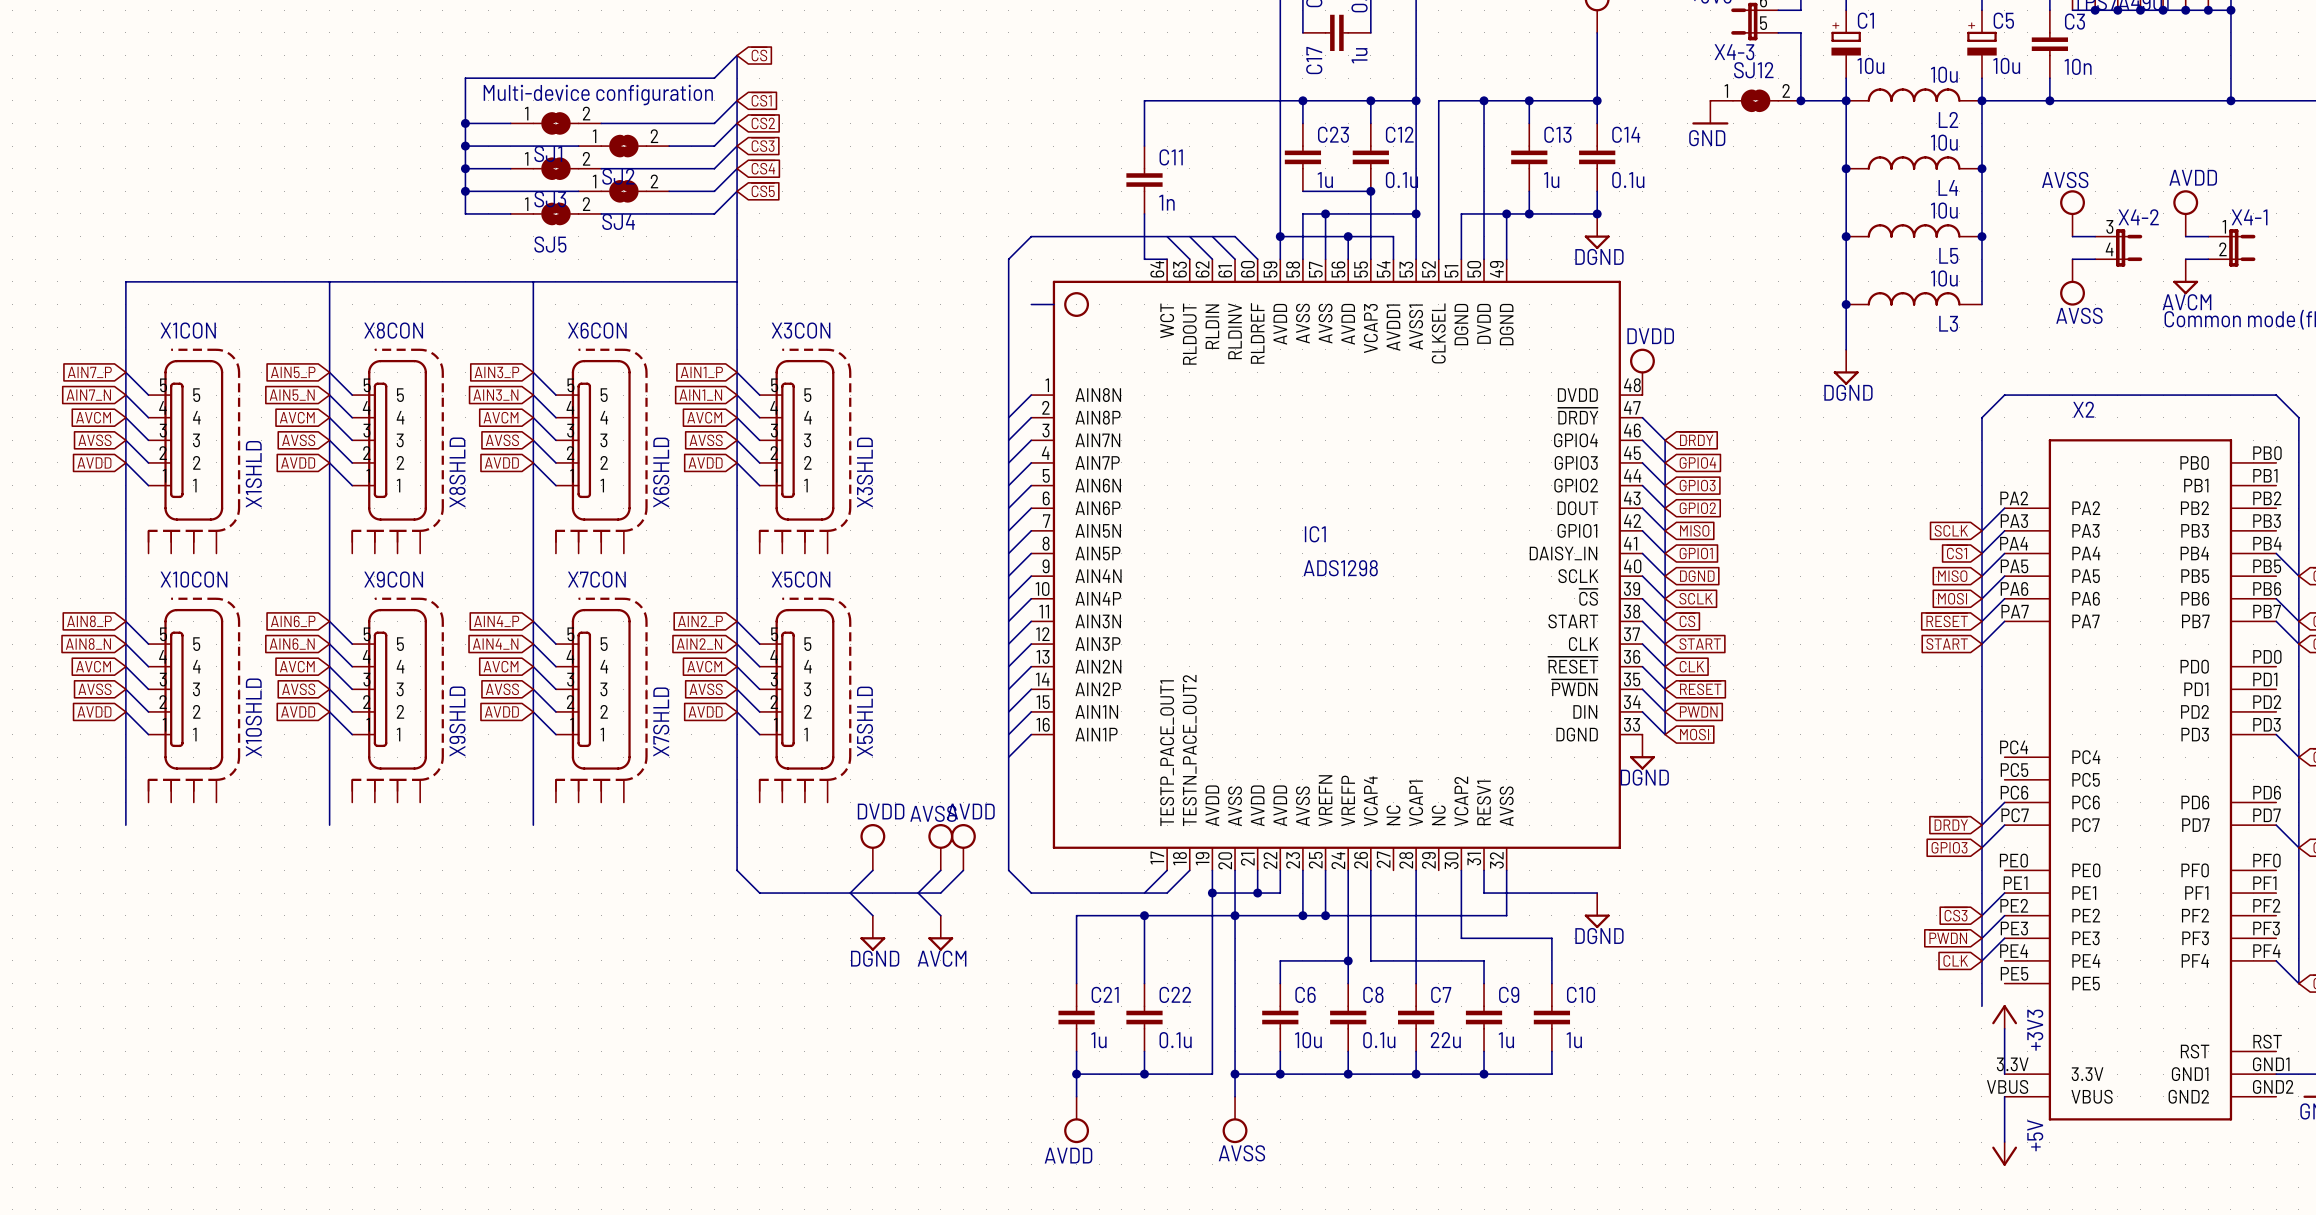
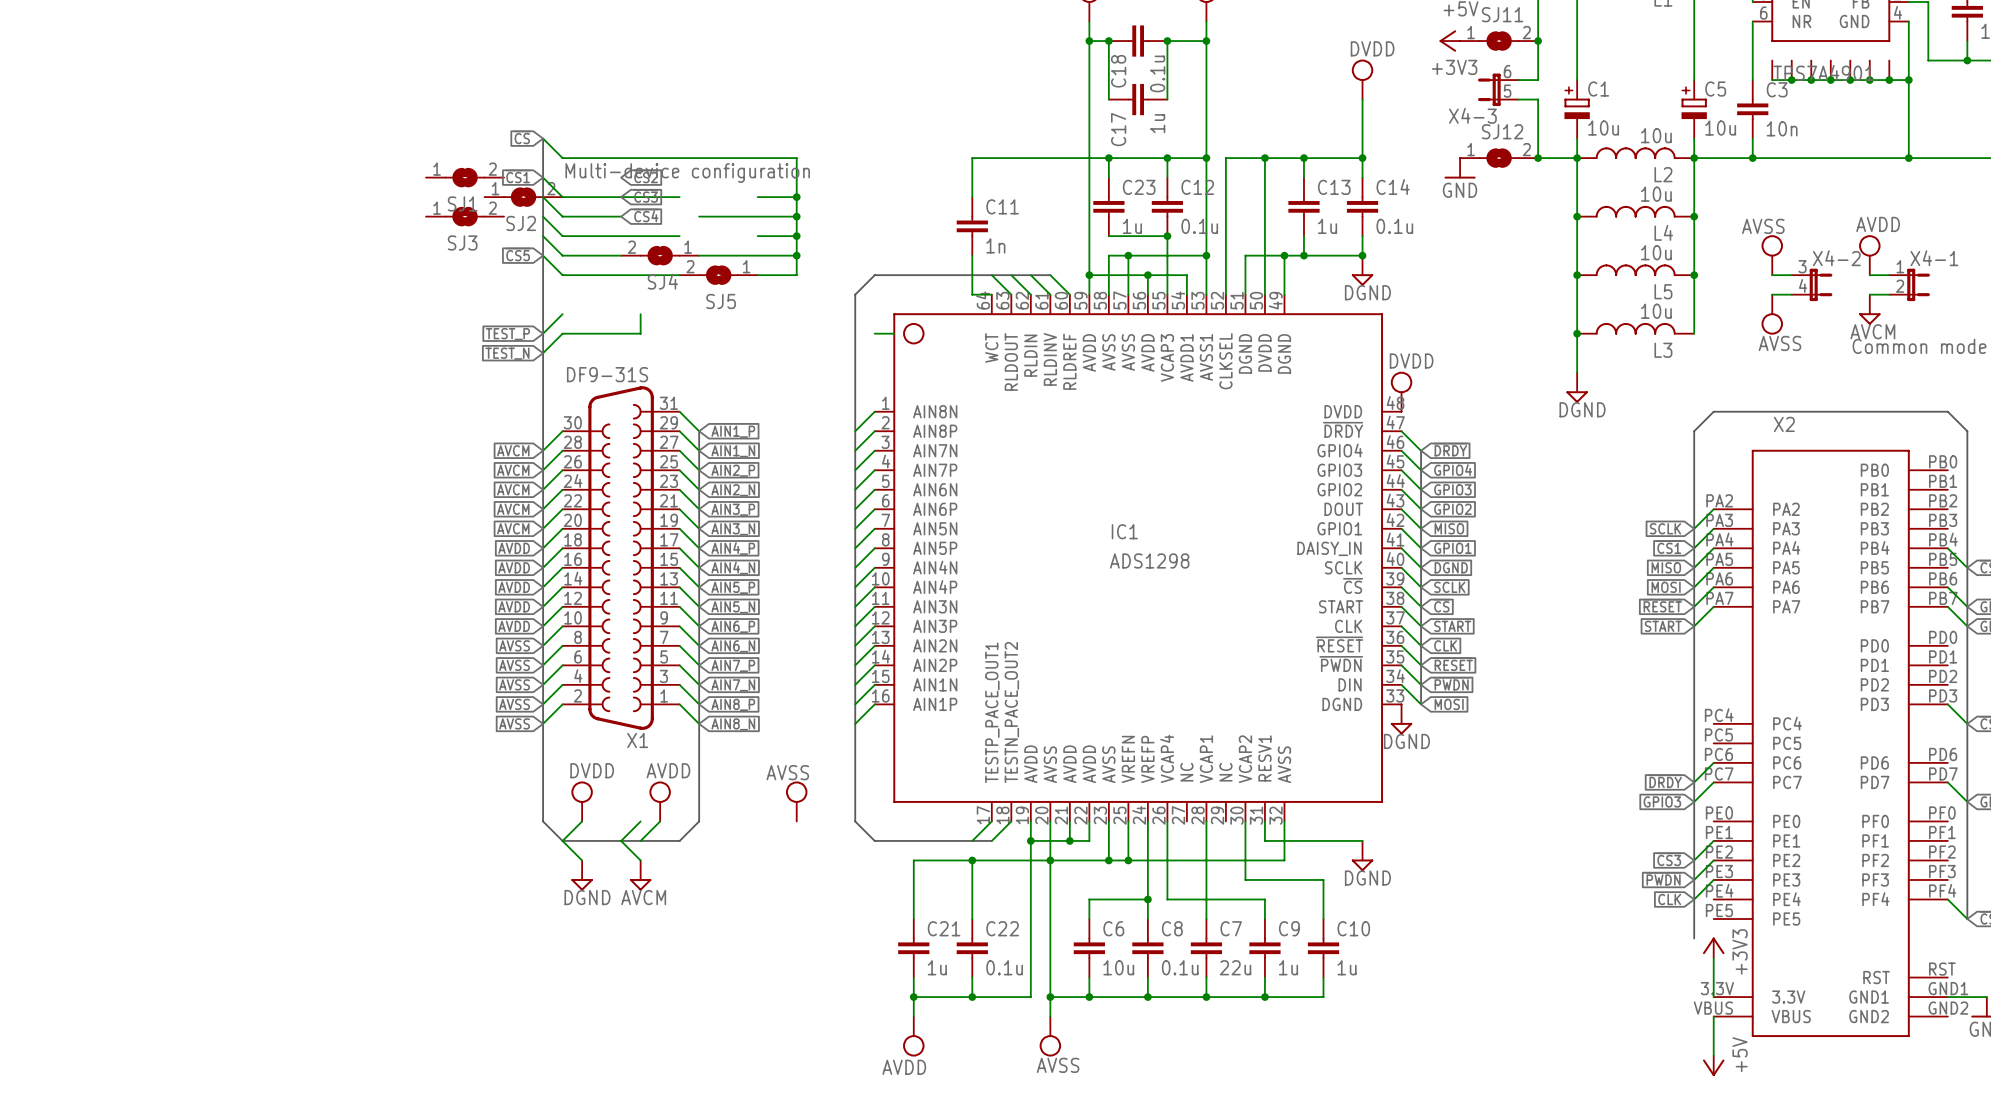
global label rotation: 0° (759, 54) -> 180° (522, 137)
global label position: ~{CS} (759, 54) -> ~{CS} (522, 137)
bus: (737, 55) (737, 870) (759, 893) -> (543, 138) (543, 821) (562, 840) (640, 840)
wire: (737, 55) (714, 78) (465, 78) (465, 213) (510, 213) -> none
wire: none -> (543, 138) (562, 158) (796, 158) (796, 275) (757, 275)
text position: Multi-device configuration (598, 95) -> Multi-device configuration (687, 173)
global label rotation: 0° (761, 99) -> 180° (518, 176)
global label position: ~{CS1} (761, 99) -> ~{CS1} (518, 176)
wire: (737, 100) (714, 123) (601, 123) -> none
wire: (465, 123) (510, 123) -> none
junction: (465, 123) -> none
wire: none -> (543, 177) (562, 197)
wire: (737, 123) (714, 146) -> (679, 197) (601, 197)
wire: (465, 146) (578, 146) -> none
junction: (465, 146) -> none
wire: (737, 146) (714, 168) -> (621, 216) (601, 216)
wire: none -> (757, 197) (796, 197)
junction: none -> (796, 197)
wire: (465, 168) (510, 168) -> none
junction: (465, 168) -> none
wire: (601, 168) (669, 168) -> (543, 197) (562, 216)
wire: none -> (543, 216) (562, 236)
wire: (737, 168) (714, 191) -> (679, 236) (601, 236)
wire: none -> (699, 216) (796, 216)
junction: none -> (796, 216)
global label rotation: 0° (763, 190) -> 180° (518, 254)
global label position: ~{CS5} (763, 190) -> ~{CS5} (518, 254)
wire: (465, 191) (578, 191) -> none
junction: (465, 191) -> none
SJ4 rotation: 0° (623, 191) -> 180° (660, 255)
SJ4 position: (623, 191) -> (660, 255)
wire: (737, 191) (714, 213) -> (621, 255) (601, 255)
wire: none -> (757, 236) (796, 236)
junction: none -> (796, 236)
SJ5 rotation: 0° (555, 213) -> 180° (718, 275)
SJ5 position: (555, 213) -> (718, 275)
wire: (601, 213) (669, 213) -> (543, 236) (562, 255)
wire: none -> (543, 255) (562, 275) (679, 275)
wire: none -> (699, 255) (796, 255)
junction: none -> (796, 255)
bus: (329, 281) (329, 825) -> none
bus: (533, 281) (533, 825) -> none
wire: none -> (562, 314) (543, 333)
bus: (737, 281) (125, 281) (125, 825) -> none
wire: none -> (640, 314) (640, 333) (562, 333) (543, 353)
global label: none -> TEST_P (507, 334)
global label: none -> TEST_N (507, 353)
global label: AIN7_P (89, 372) -> none
wire: (125, 372) (148, 395) -> none
global label: AIN5_P (293, 372) -> none
wire: (329, 372) (352, 395) -> none
global label: AIN3_P (496, 372) -> none
wire: (533, 372) (555, 395) -> none
global label rotation: 0° (701, 372) -> 180° (733, 431)
global label position: AIN1_P (701, 372) -> AIN1_P (733, 431)
wire: (737, 372) (759, 395) -> (679, 411) (699, 431)
global label: AIN7_N (88, 395) -> none
wire: (125, 395) (148, 417) -> none
global label: AIN5_N (292, 395) -> none
wire: (329, 395) (352, 417) -> none
global label: AIN3_N (495, 395) -> none
wire: (533, 395) (555, 417) -> none
global label rotation: 0° (700, 395) -> 180° (733, 451)
global label position: AIN1_N (700, 395) -> AIN1_N (733, 451)
wire: (737, 395) (759, 417) -> (679, 431) (699, 450)
global label: AVCM (93, 417) -> none
wire: (125, 417) (148, 440) -> none
global label: AVCM (297, 417) -> none
wire: (329, 417) (352, 440) -> none
global label: AVCM (500, 417) -> none
wire: (533, 417) (555, 440) -> none
wire: none -> (562, 431) (543, 450)
global label: AVCM (704, 417) -> none
wire: (737, 417) (759, 440) -> (679, 450) (699, 470)
global label: AVSS (94, 440) -> none
wire: (125, 440) (148, 462) -> none
X1CON: (185, 440) -> none
global label: AVSS (298, 440) -> none
wire: (329, 440) (352, 462) -> none
X8CON: (389, 440) -> none
global label: AVSS (502, 440) -> none
wire: (533, 440) (555, 462) -> none
X6CON: (593, 440) -> none
global label: none -> AVCM (513, 450)
wire: none -> (562, 450) (543, 470)
global label: AVSS (706, 440) -> none
wire: (737, 440) (759, 462) -> (679, 470) (699, 489)
X3CON: (797, 440) -> none
X1SHLD: (193, 451) -> none
X8SHLD: (397, 451) -> none
X6SHLD: (601, 451) -> none
X3SHLD: (804, 451) -> none
global label: AVDD (94, 462) -> none
wire: (125, 462) (148, 485) -> none
global label: AVDD (298, 462) -> none
wire: (329, 462) (352, 485) -> none
global label: AVDD (501, 462) -> none
wire: (533, 462) (555, 485) -> none
global label: none -> AVCM (513, 470)
wire: none -> (562, 470) (543, 489)
global label: AVDD (705, 462) -> none
wire: (737, 462) (759, 485) -> (679, 489) (699, 509)
global label: none -> AVCM (513, 489)
wire: none -> (562, 489) (543, 509)
global label: none -> AVCM (513, 509)
wire: none -> (562, 509) (543, 528)
wire: none -> (679, 509) (699, 528)
global label: none -> AIN3_P (733, 509)
global label: none -> AVCM (513, 528)
wire: none -> (562, 528) (543, 548)
wire: none -> (679, 528) (699, 548)
global label: none -> AIN3_N (733, 529)
global label: none -> AVDD (514, 548)
wire: none -> (562, 548) (543, 567)
wire: none -> (679, 548) (699, 567)
global label: none -> AIN4_P (733, 548)
X1: none -> DF9-31S (621, 558)
global label: none -> AVDD (514, 567)
wire: none -> (562, 567) (543, 587)
wire: none -> (679, 567) (699, 587)
global label: none -> AIN4_N (733, 568)
global label: none -> AVDD (514, 587)
wire: none -> (562, 587) (543, 606)
wire: none -> (679, 587) (699, 606)
global label: none -> AIN5_P (733, 587)
global label: AIN8_P (89, 621) -> none
wire: (125, 621) (148, 644) -> none
global label: AIN6_P (293, 621) -> none
wire: (329, 621) (352, 644) -> none
global label: AIN4_P (496, 621) -> none
wire: (533, 621) (555, 644) -> none
global label: none -> AVDD (514, 606)
wire: none -> (562, 606) (543, 626)
global label rotation: 0° (700, 621) -> 180° (733, 470)
global label position: AIN2_P (700, 621) -> AIN2_P (733, 470)
wire: (737, 621) (759, 644) -> (679, 626) (699, 645)
wire: none -> (679, 606) (699, 626)
global label: none -> AIN5_N (733, 607)
global label rotation: 0° (699, 643) -> 180° (733, 490)
global label position: AIN2_N (699, 643) -> AIN2_N (733, 490)
global label: AIN8_N (88, 644) -> none
wire: (125, 644) (148, 666) -> none
global label: AIN6_N (292, 644) -> none
wire: (329, 644) (352, 666) -> none
global label: AIN4_N (495, 644) -> none
wire: (533, 644) (555, 666) -> none
global label: none -> AVDD (514, 626)
wire: none -> (562, 626) (543, 645)
wire: (737, 644) (759, 666) -> (679, 645) (699, 665)
global label: none -> AIN6_P (733, 626)
global label: AVCM (93, 666) -> none
wire: (125, 666) (148, 689) -> none
global label: AVCM (297, 666) -> none
wire: (329, 666) (352, 689) -> none
global label: AVCM (500, 666) -> none
wire: (533, 666) (555, 689) -> none
global label: none -> AVSS (514, 645)
wire: none -> (562, 645) (543, 665)
global label: AVCM (704, 666) -> none
wire: (737, 666) (759, 689) -> (679, 665) (699, 684)
global label: none -> AIN6_N (733, 646)
global label: AVSS (94, 689) -> none
wire: (125, 689) (148, 711) -> none
X10CON: (185, 689) -> none
global label: AVSS (298, 689) -> none
wire: (329, 689) (352, 711) -> none
X9CON: (389, 689) -> none
global label: AVSS (502, 689) -> none
wire: (533, 689) (555, 711) -> none
X7CON: (593, 689) -> none
global label: none -> AVSS (514, 665)
wire: none -> (562, 665) (543, 684)
global label: AVSS (706, 689) -> none
wire: (737, 689) (759, 711) -> (679, 684) (699, 704)
X5CON: (797, 689) -> none
global label: none -> AIN7_P (733, 665)
X10SHLD: (193, 700) -> none
X9SHLD: (397, 700) -> none
X7SHLD: (601, 700) -> none
X5SHLD: (804, 700) -> none
global label: AVDD (94, 711) -> none
wire: (125, 711) (148, 734) -> none
global label: AVDD (298, 711) -> none
wire: (329, 711) (352, 734) -> none
global label: AVDD (501, 711) -> none
wire: (533, 711) (555, 734) -> none
global label: none -> AVSS (514, 684)
wire: none -> (562, 684) (543, 704)
global label: AVDD (705, 711) -> none
wire: (737, 711) (759, 734) -> (679, 704) (699, 723)
global label: none -> AIN7_N (733, 685)
global label: none -> AVSS (514, 704)
wire: none -> (562, 704) (543, 723)
global label: none -> AIN8_P (733, 704)
global label: none -> AVSS (514, 723)
global label: none -> AIN8_N (733, 724)
power symbol position: DVDD (872, 847) -> DVDD (582, 801)
power symbol position: AVDD (963, 847) -> AVDD (660, 801)
wire: (872, 870) (850, 893) (872, 915) -> (582, 821) (562, 840) (582, 860)
wire: (940, 870) (918, 893) (940, 915) -> (640, 821) (621, 840) (640, 860)
wire: (963, 870) (940, 893) -> (660, 821) (640, 840)
bus: (804, 893) (940, 893) -> (679, 840) (699, 821) (699, 431)
power symbol position: DGND (872, 933) -> DGND (582, 875)
power symbol position: AVCM (940, 933) -> AVCM (640, 875)

